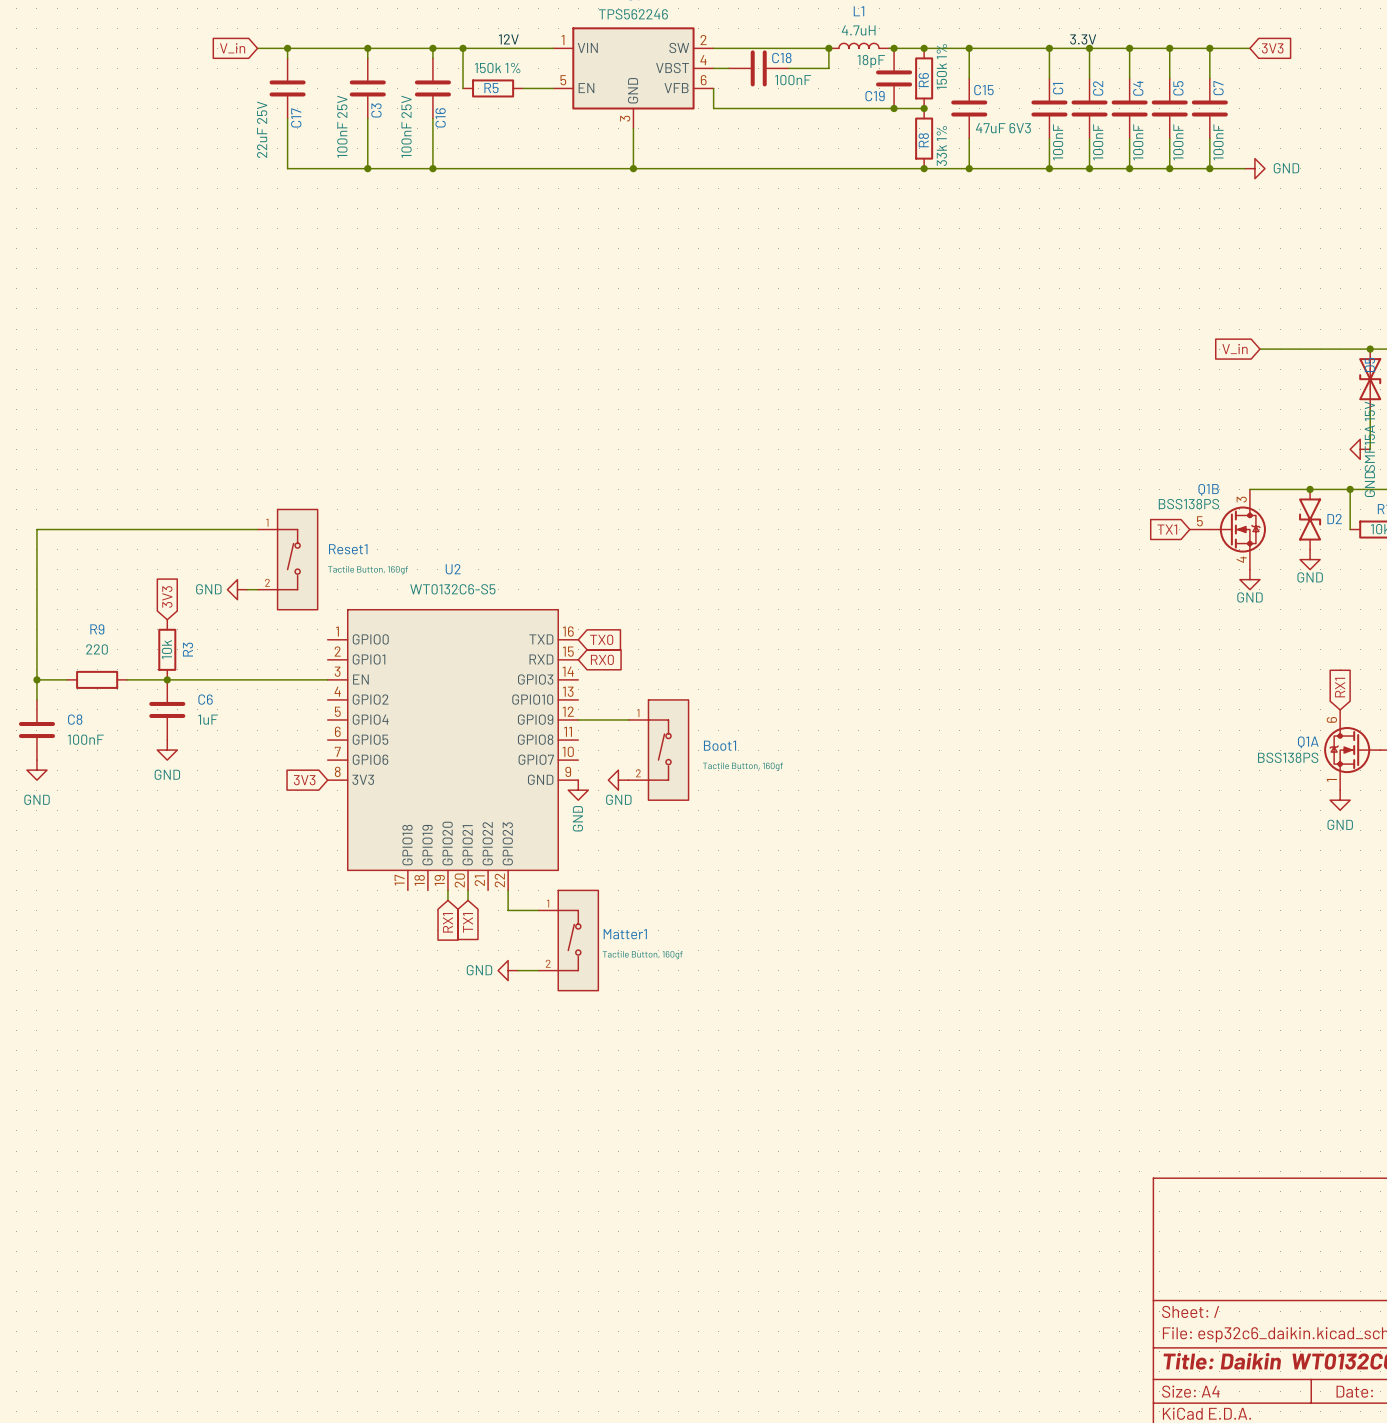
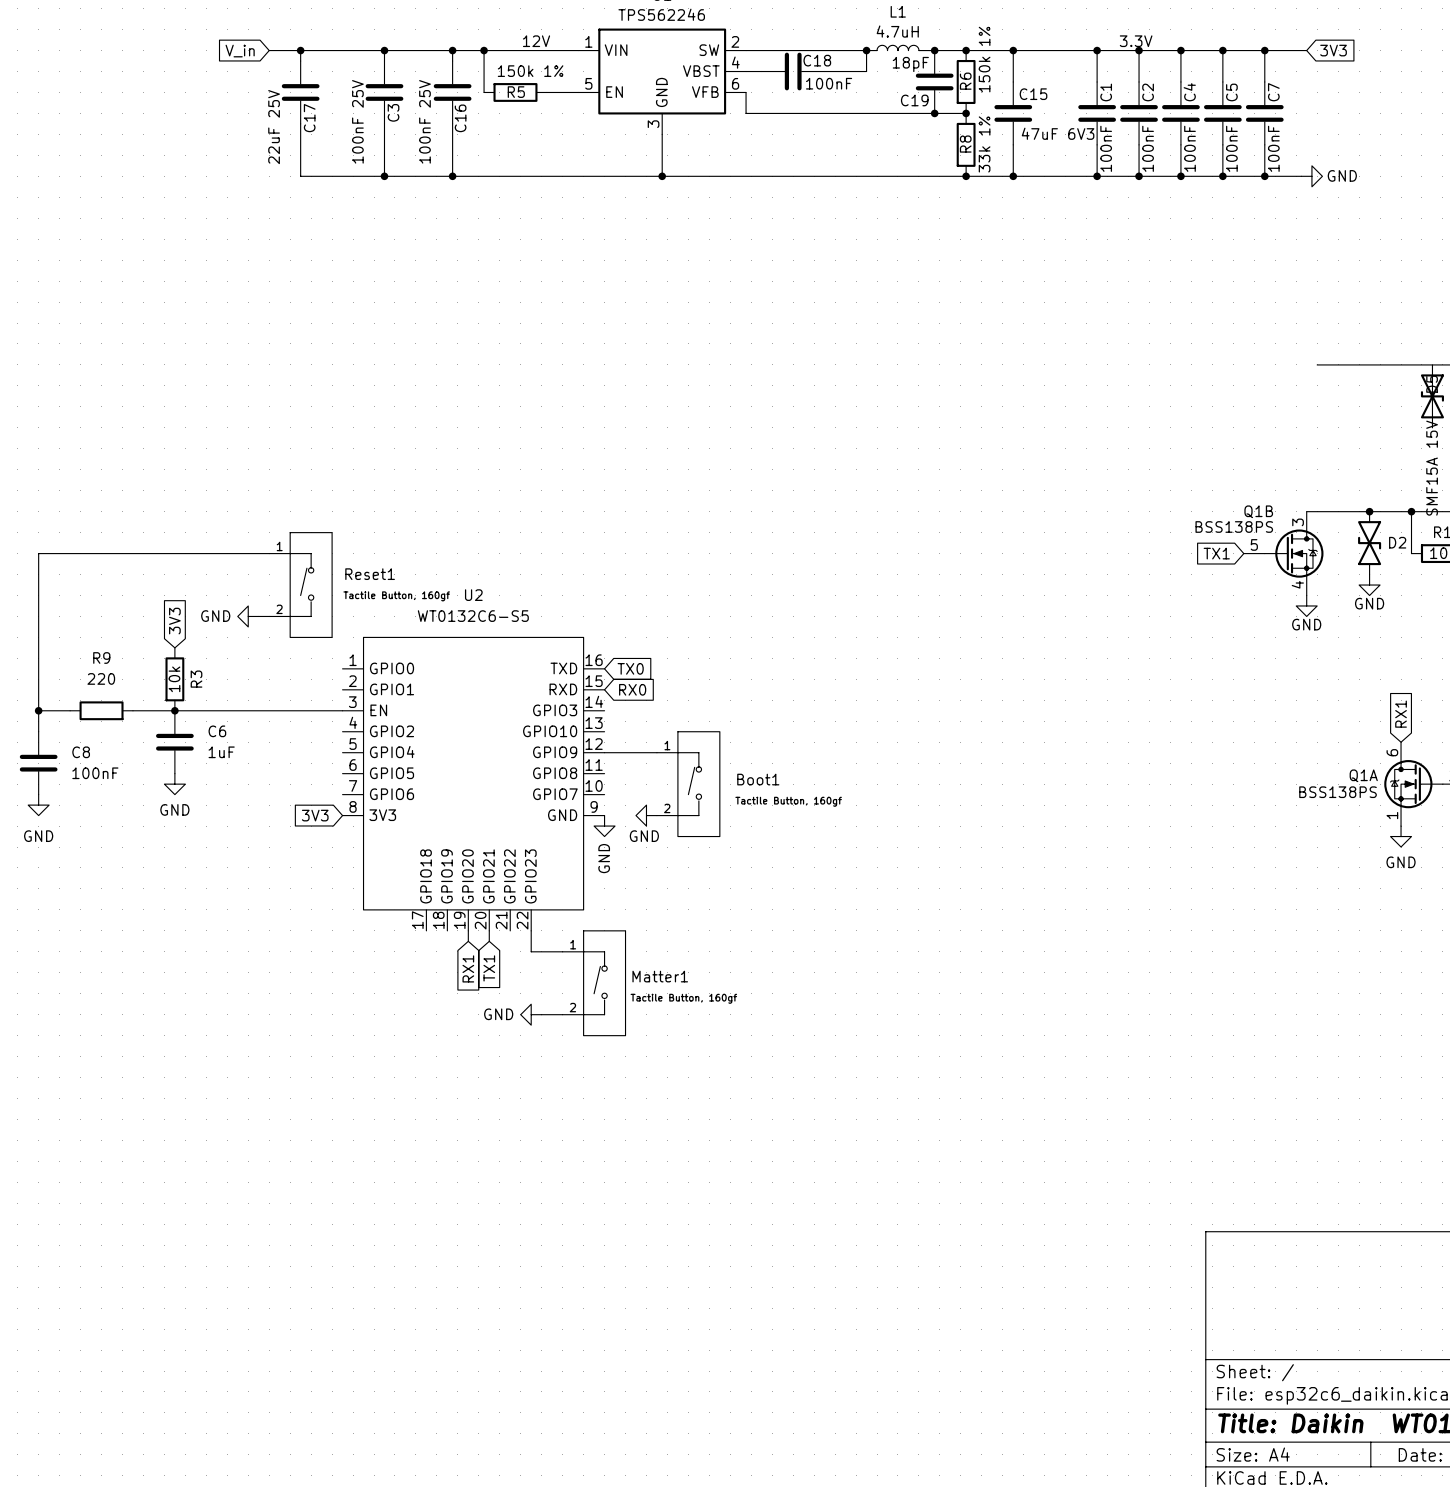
global label: V_in (1235, 349) -> none
junction: (1370, 349) -> none
wire: (1370, 409) (1370, 449) -> none
power symbol: GND (1360, 449) -> none

